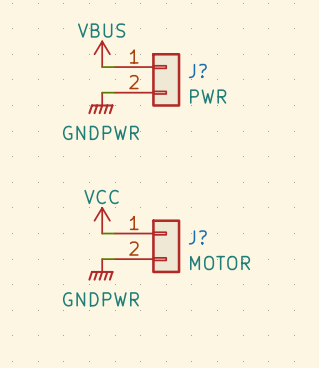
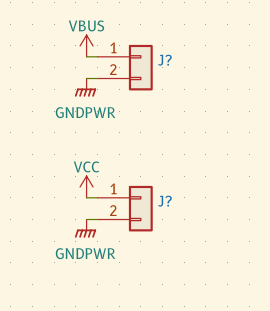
J? value: PWR (208, 96) -> none
J? value: MOTOR (220, 263) -> none

